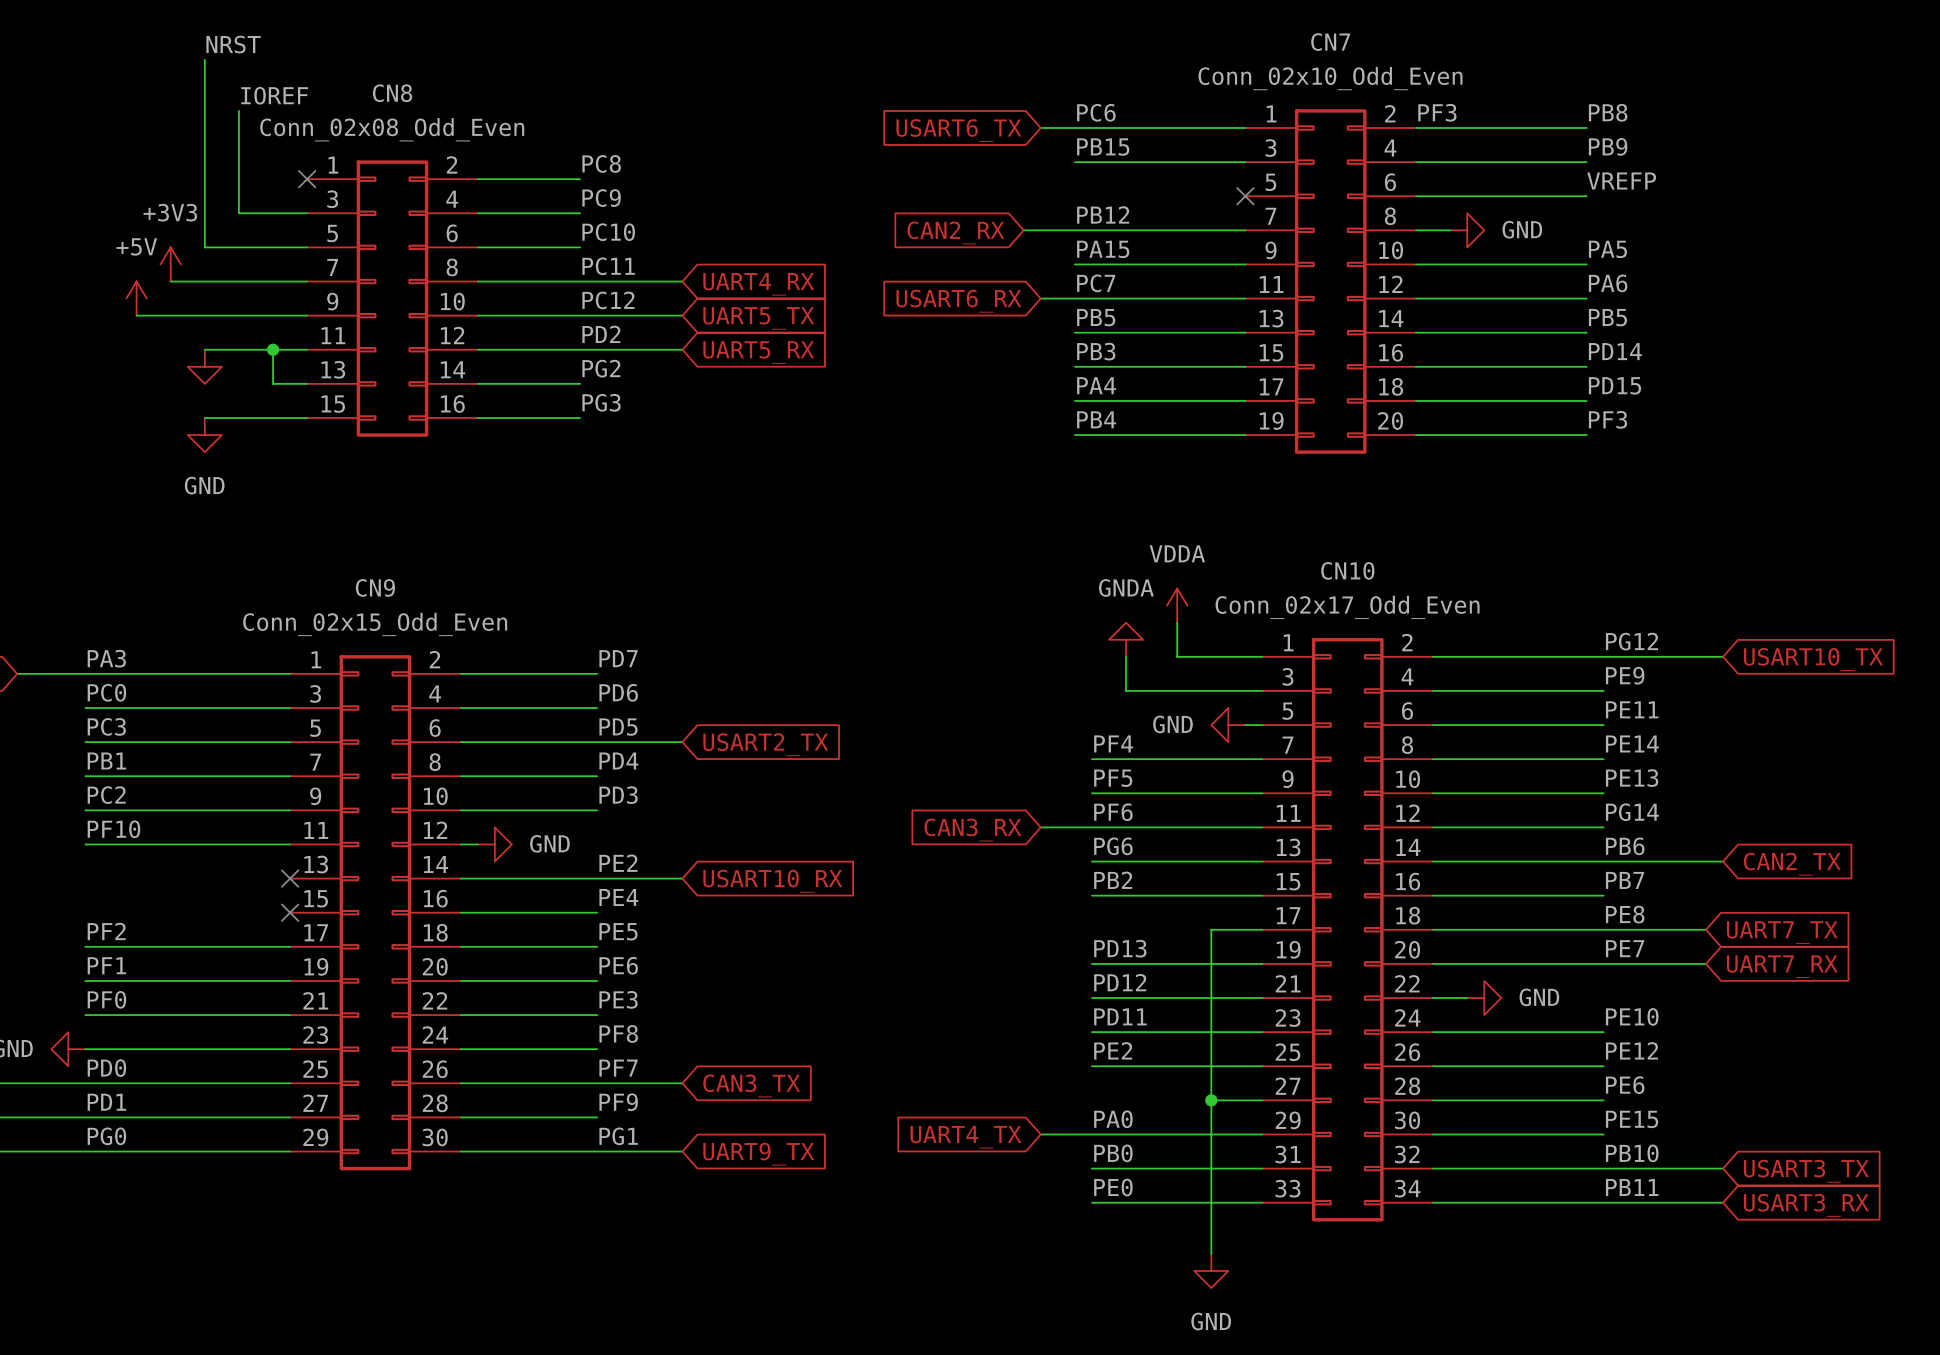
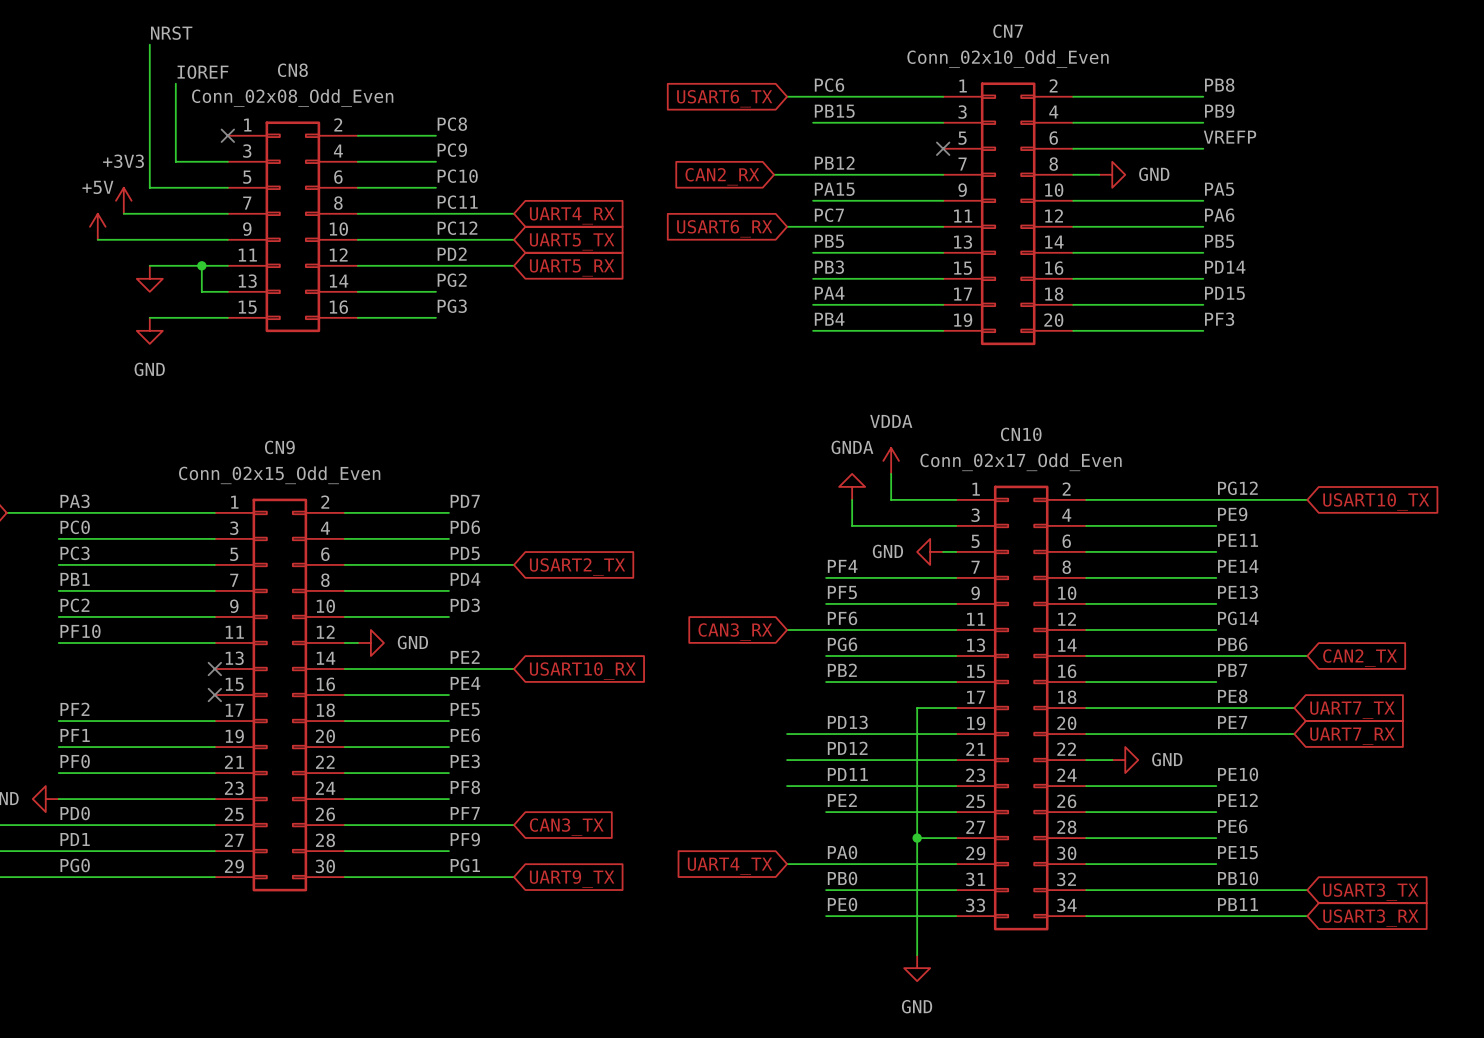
label: PF3 (1437, 112) -> none
wire: none -> (787, 734) (826, 734)
wire: none -> (787, 760) (826, 760)
wire: none -> (787, 786) (826, 786)

